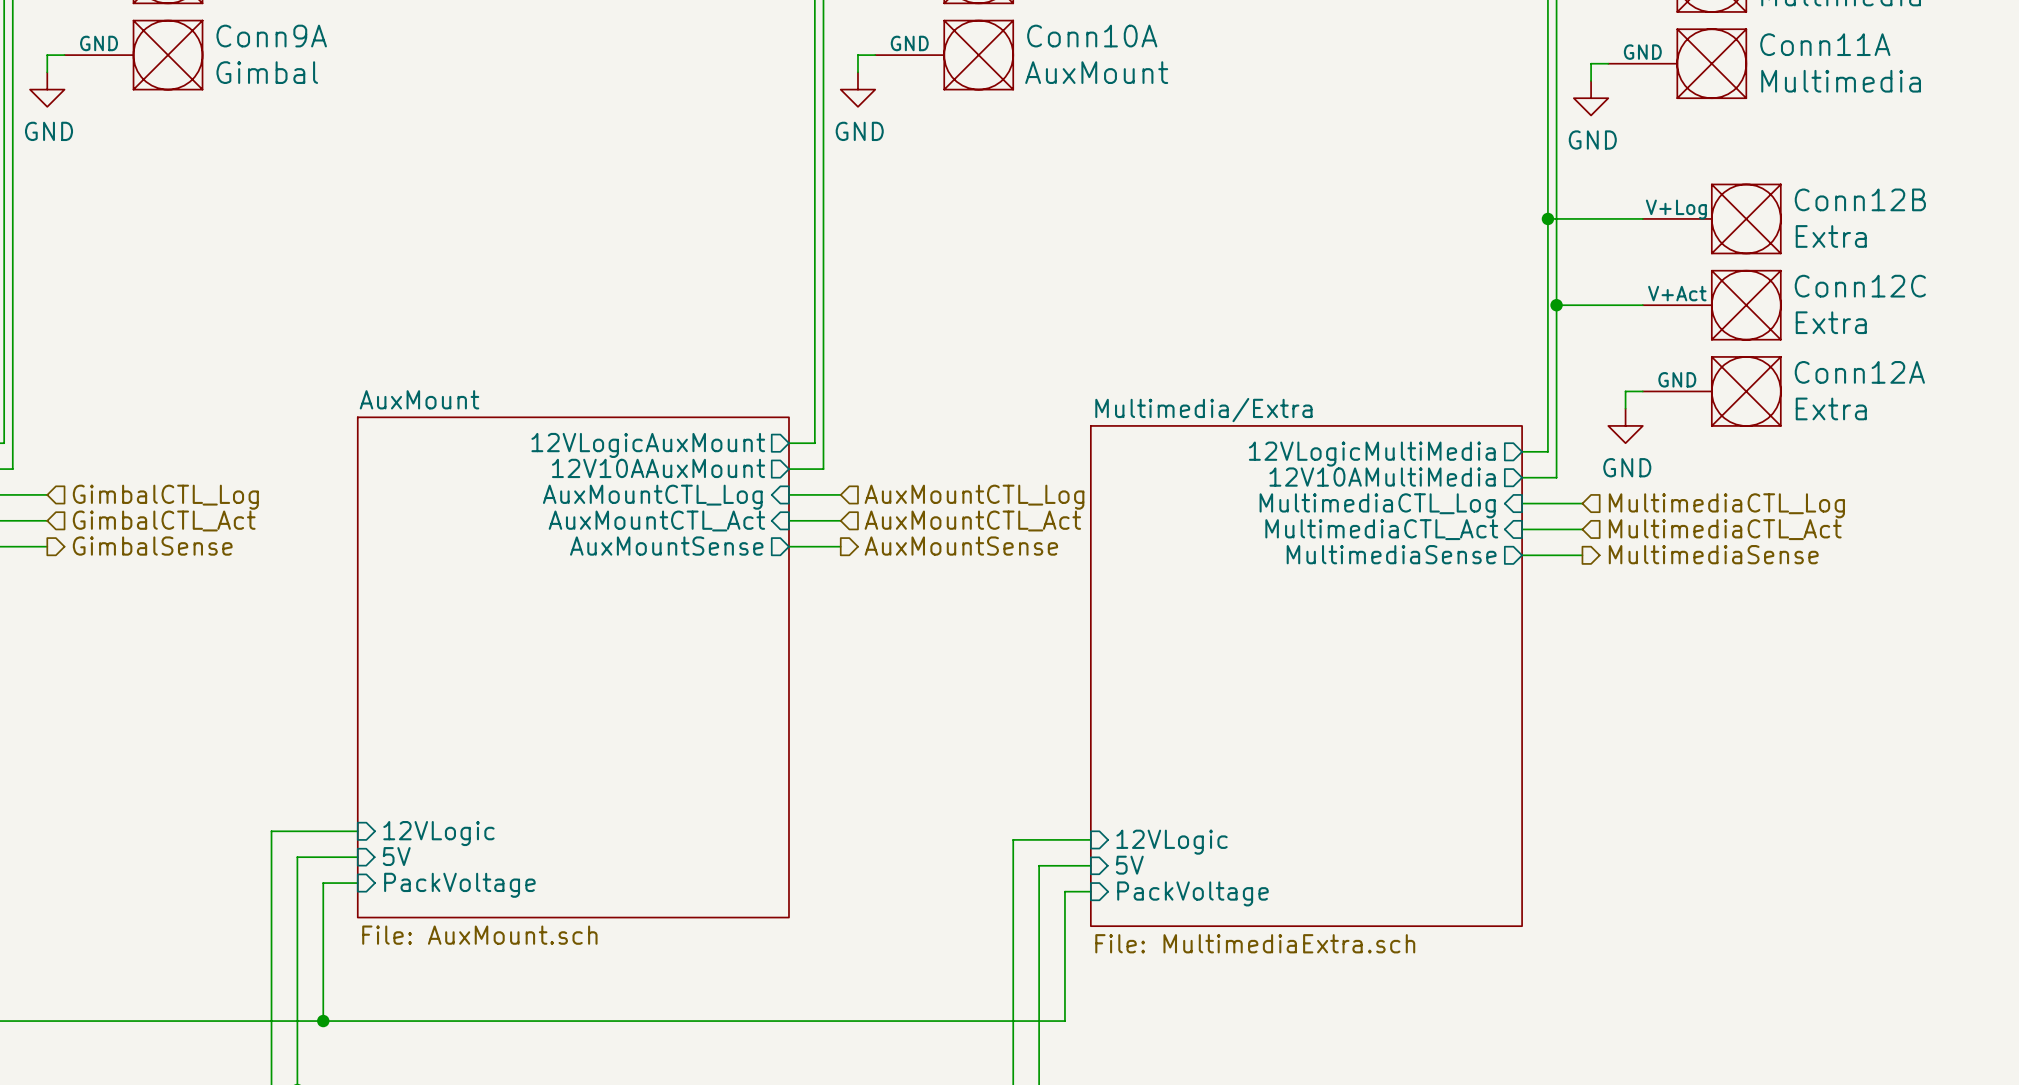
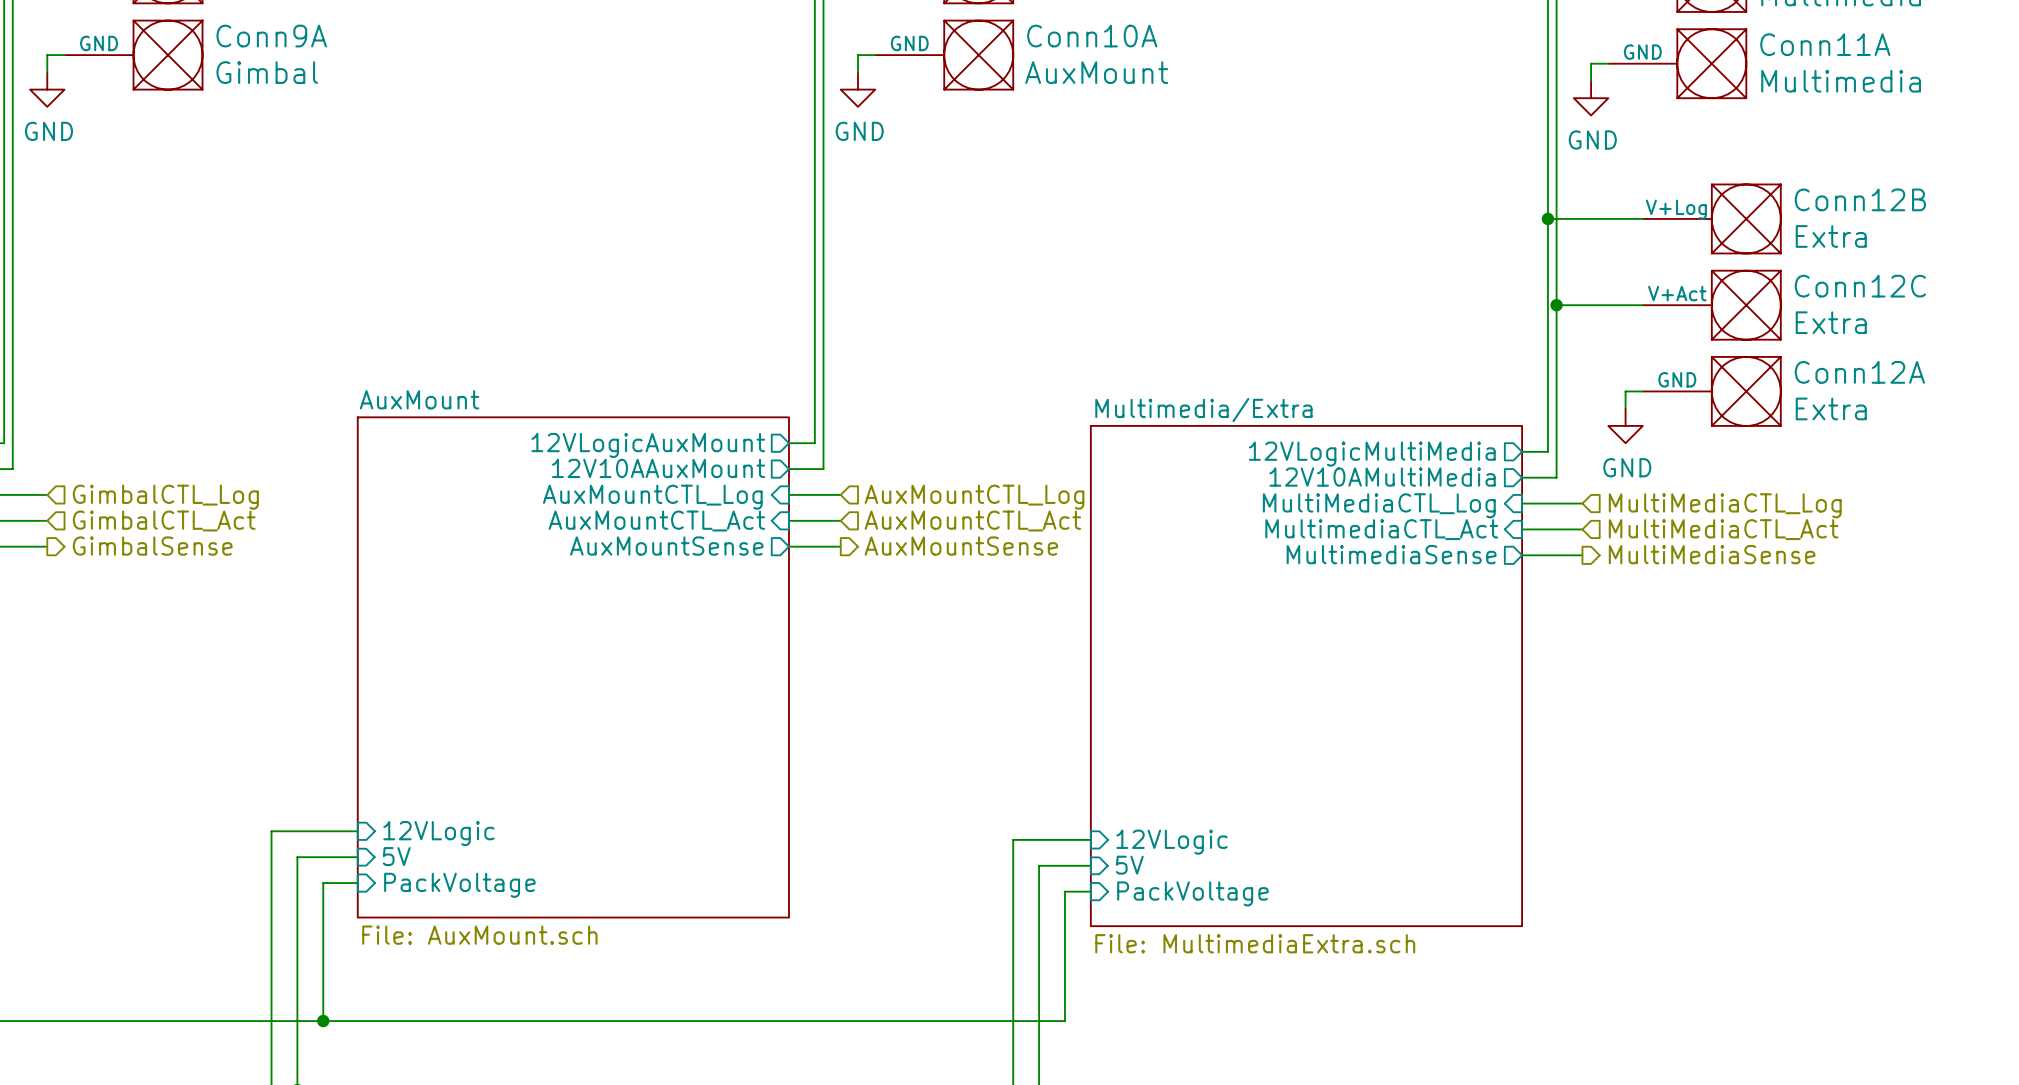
sheet pin: MultimediaCTL_Log (1377, 505) -> MultiMediaCTL_Log (1379, 505)
hierarchical label: MultimediaCTL_Log (1726, 505) -> MultiMediaCTL_Log (1725, 505)
hierarchical label: MultimediaCTL_Act (1725, 529) -> MultiMediaCTL_Act (1723, 529)
hierarchical label: MultimediaSense (1713, 554) -> MultiMediaSense (1712, 554)

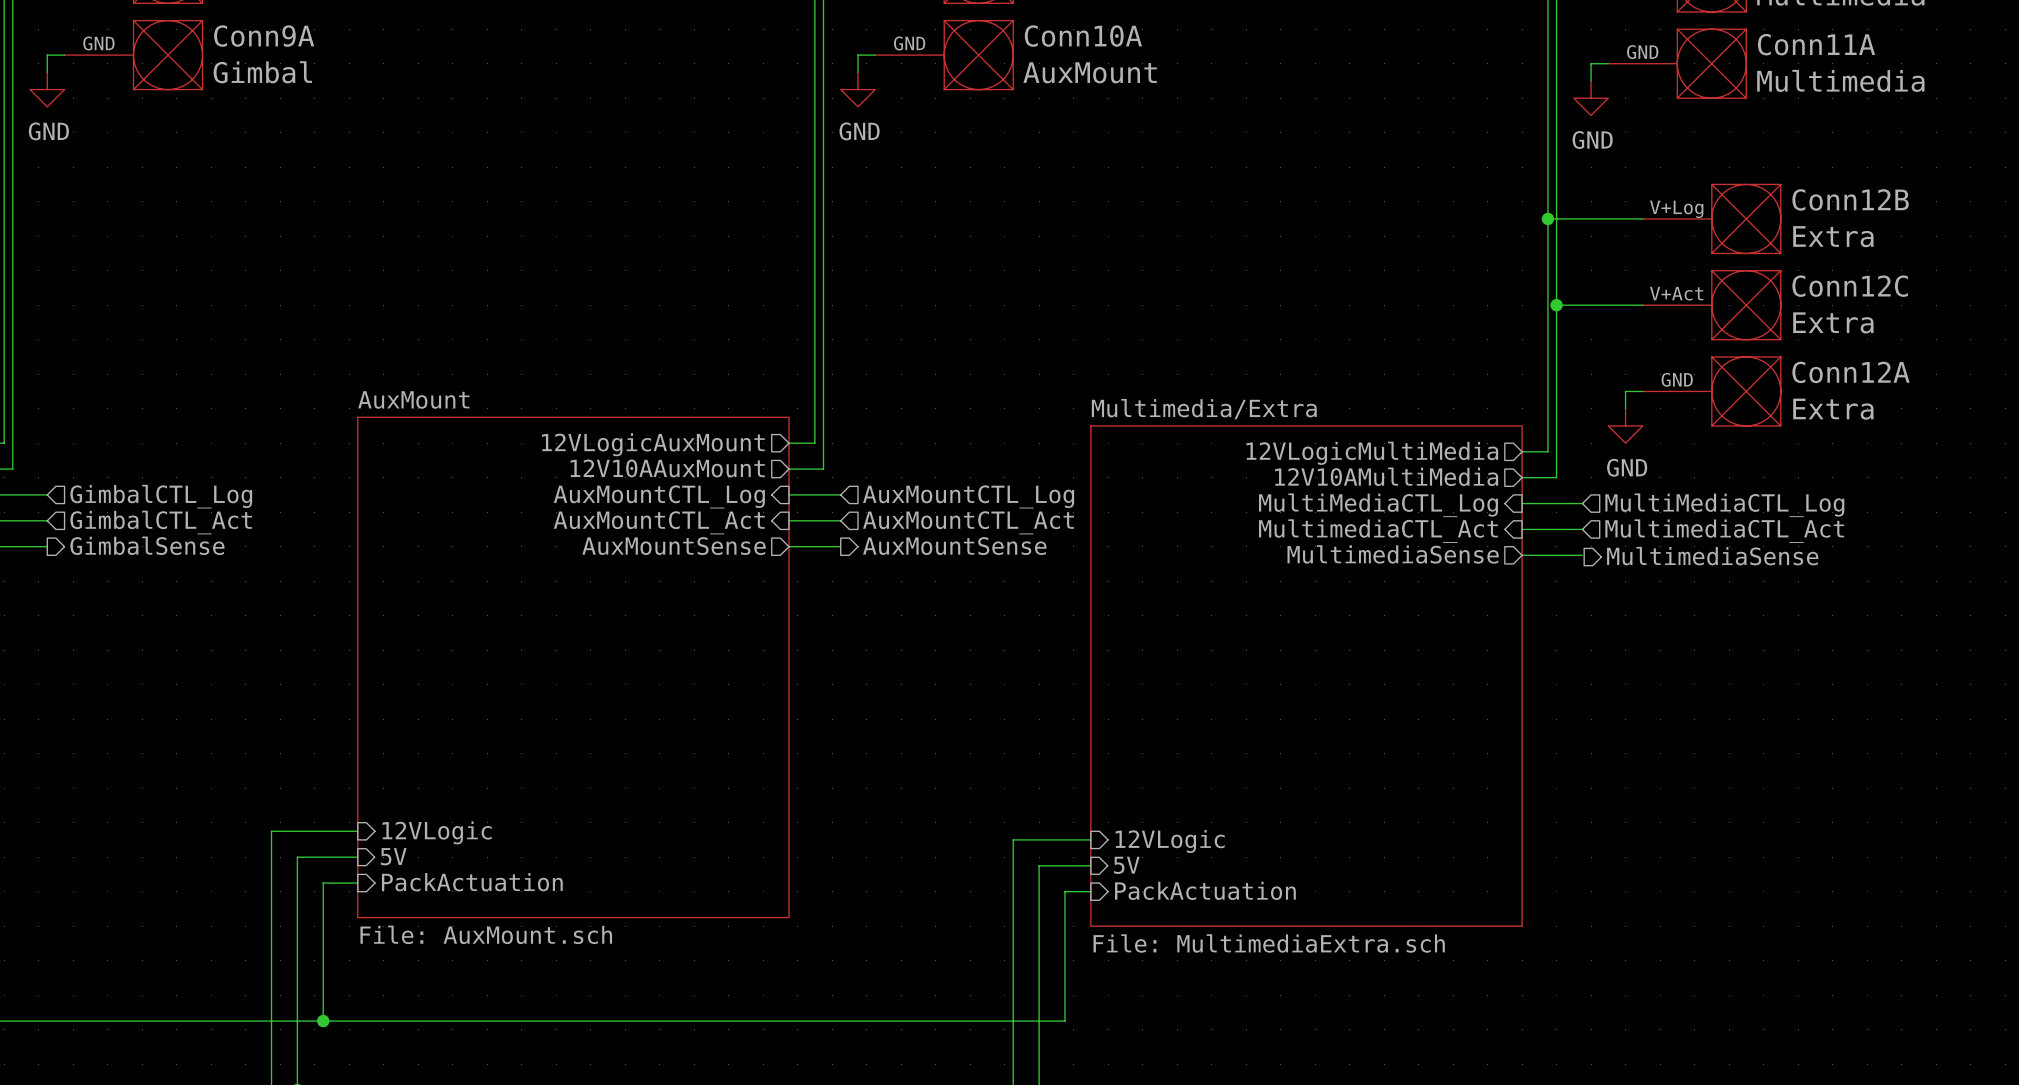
hierarchical label: MultiMediaCTL_Act (1723, 529) -> MultimediaCTL_Act (1724, 531)
hierarchical label: MultiMediaSense (1712, 554) -> MultimediaSense (1712, 556)
sheet pin: PackVoltage (459, 885) -> PackActuation (472, 882)
sheet pin: PackVoltage (1192, 893) -> PackActuation (1205, 890)

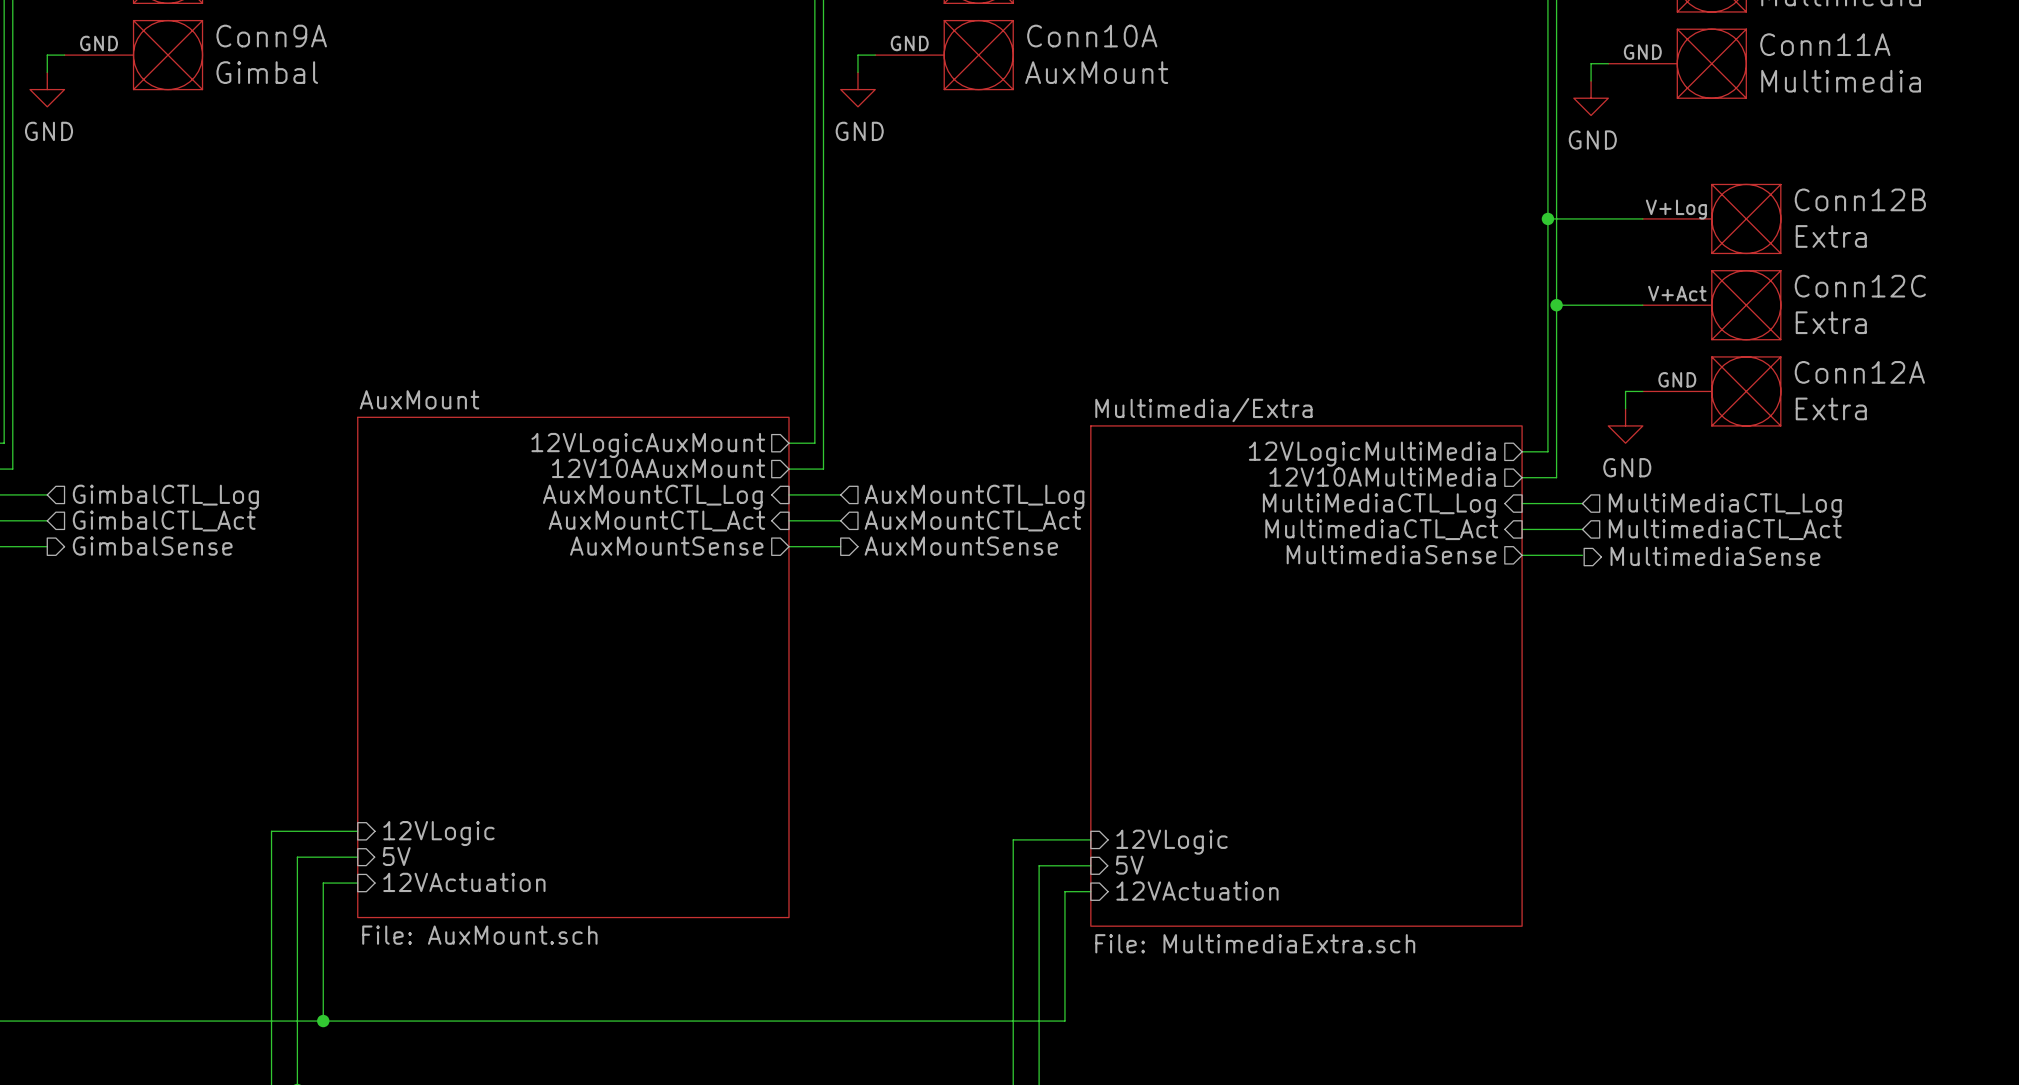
sheet pin: PackActuation (472, 882) -> 12VActuation (464, 882)
sheet pin: PackActuation (1205, 890) -> 12VActuation (1197, 891)

